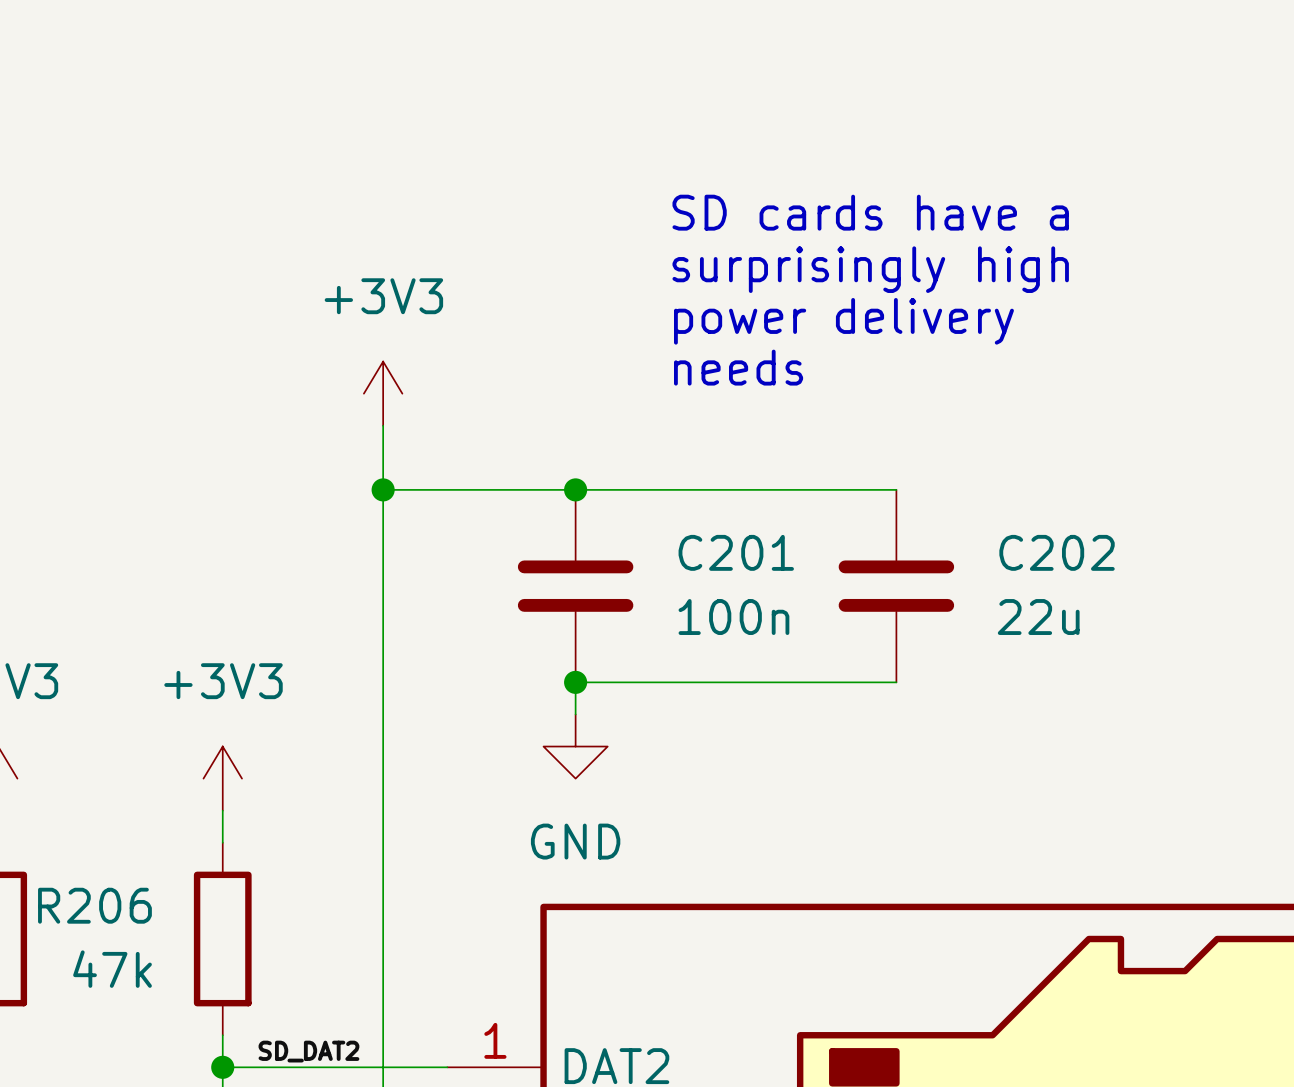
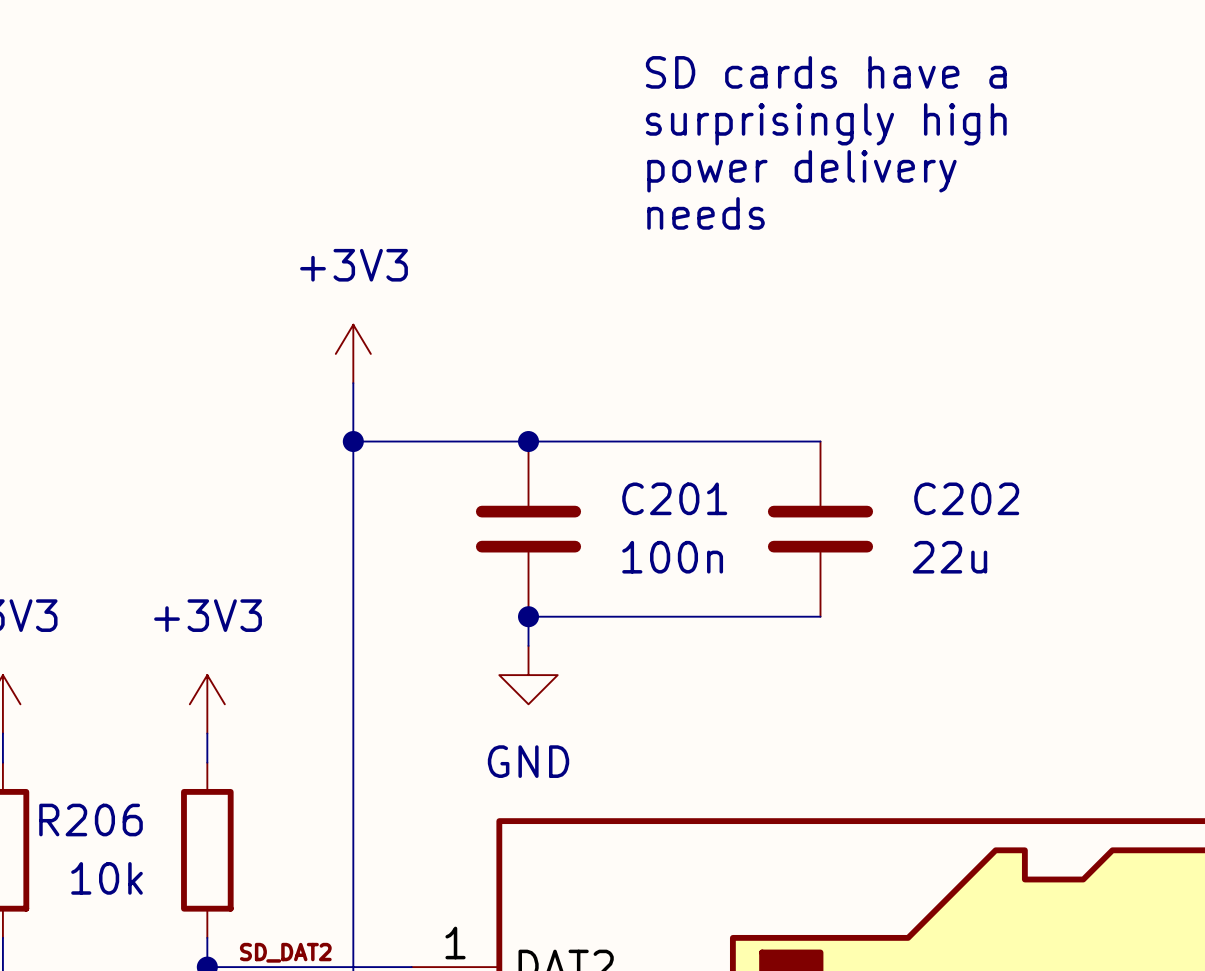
text position: SD cards have a (870, 212) -> SD cards have a (826, 72)
text position: surprisingly high (870, 269) -> surprisingly high (826, 124)
text position: power delivery (843, 321) -> power delivery (801, 171)
text position: needs (738, 367) -> needs (706, 213)
R206 value: 47k (112, 969) -> 10k (107, 878)

